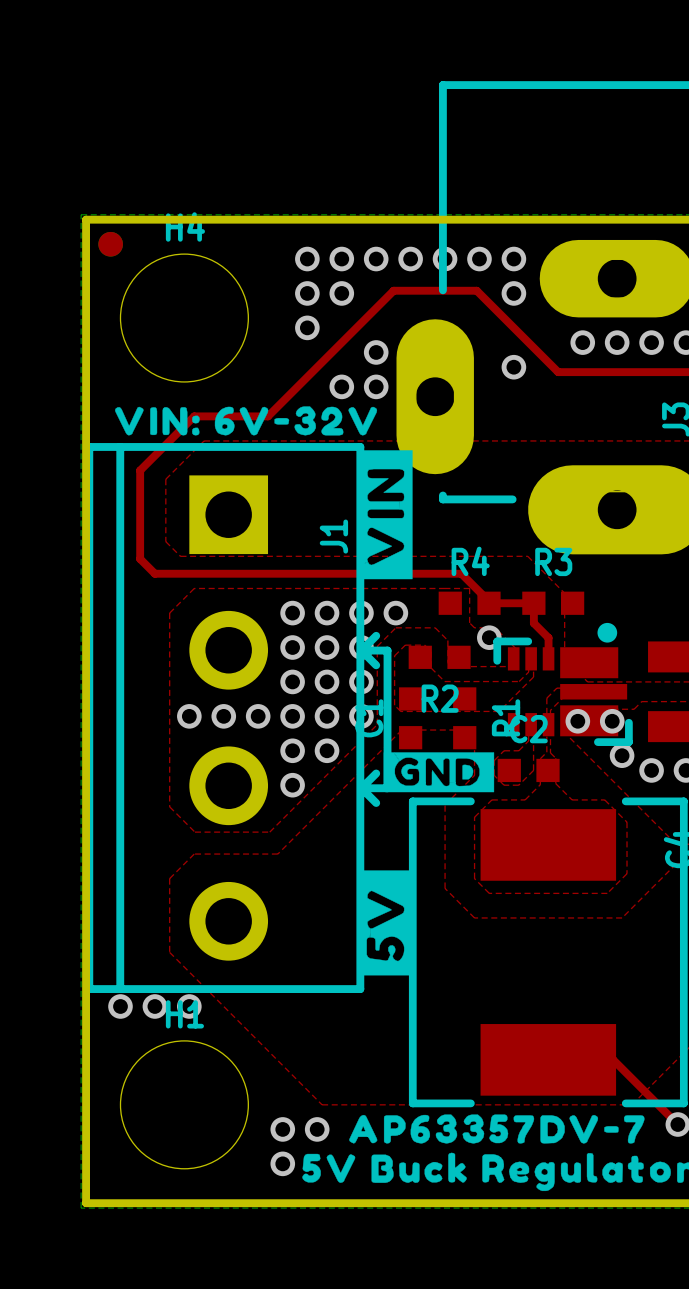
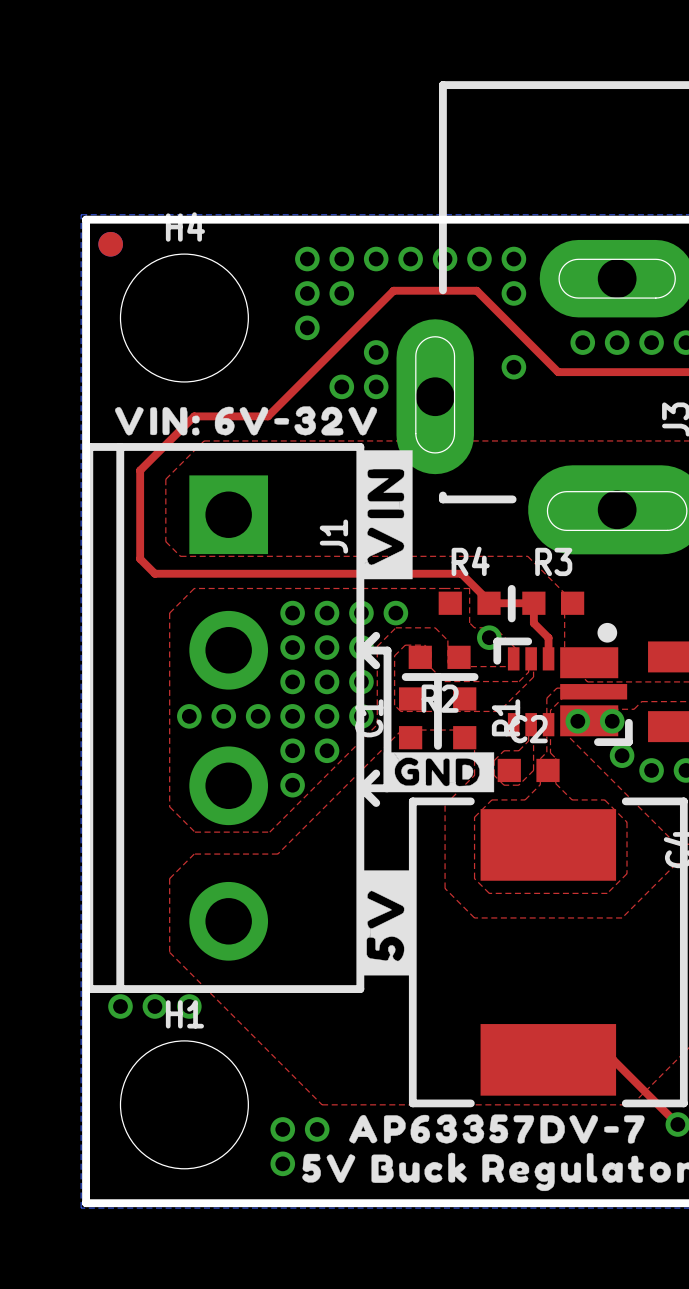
line: none -> (511, 588) (511, 618)
line: none -> (405, 677) (474, 677)
line: none -> (437, 677) (437, 745)

